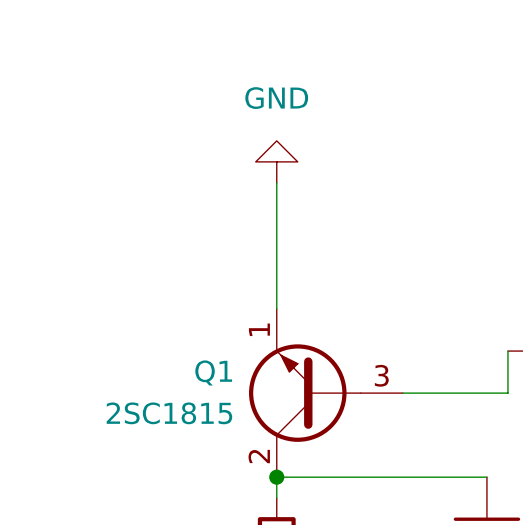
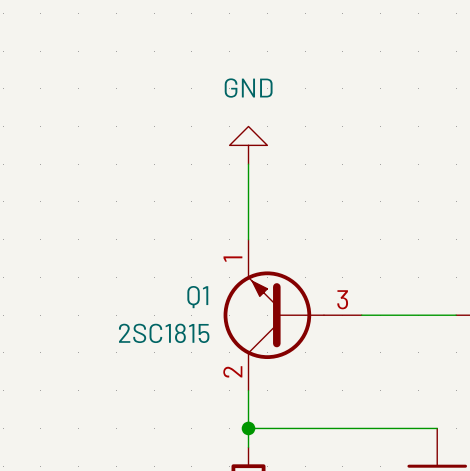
wire: (507, 351) (507, 393) (402, 393) -> (456, 315) (361, 315)
Q1 position: (325, 393) -> (292, 315)

